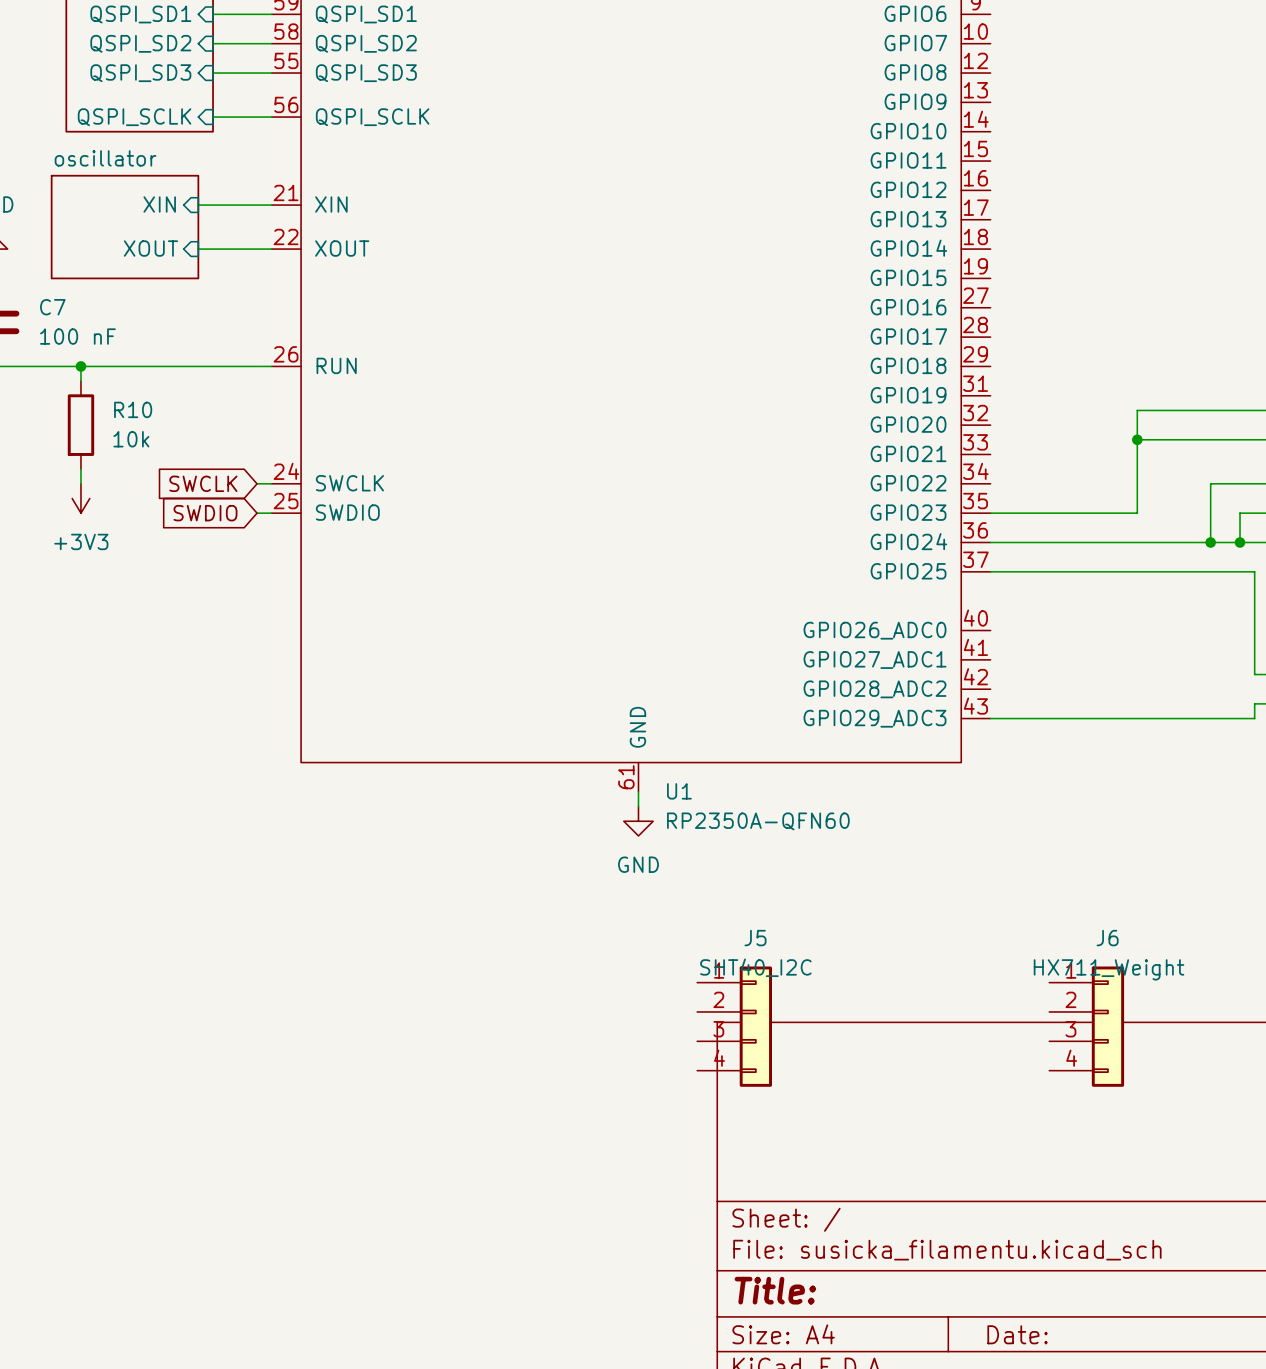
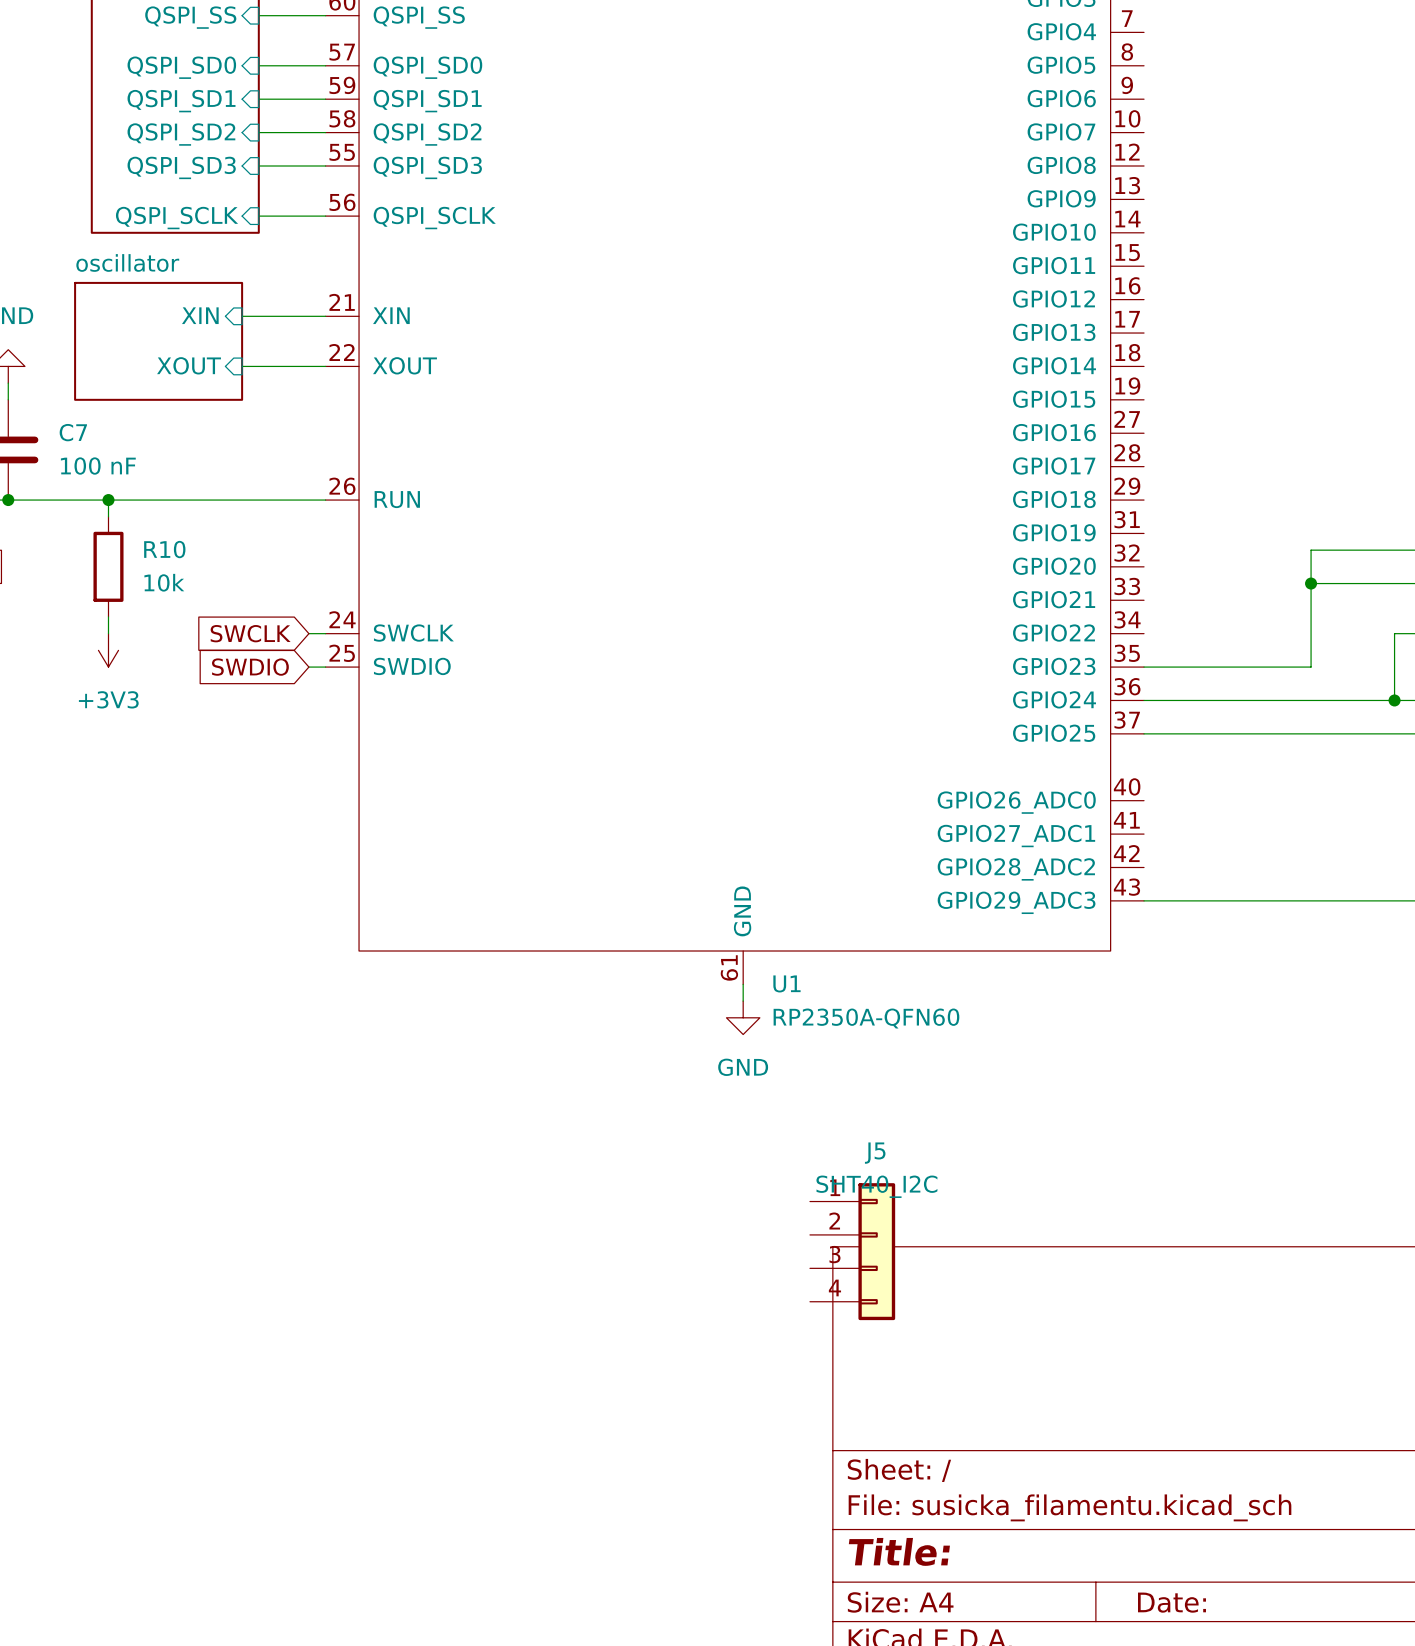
J6: HX711_Weight (1086, 1026) -> none

